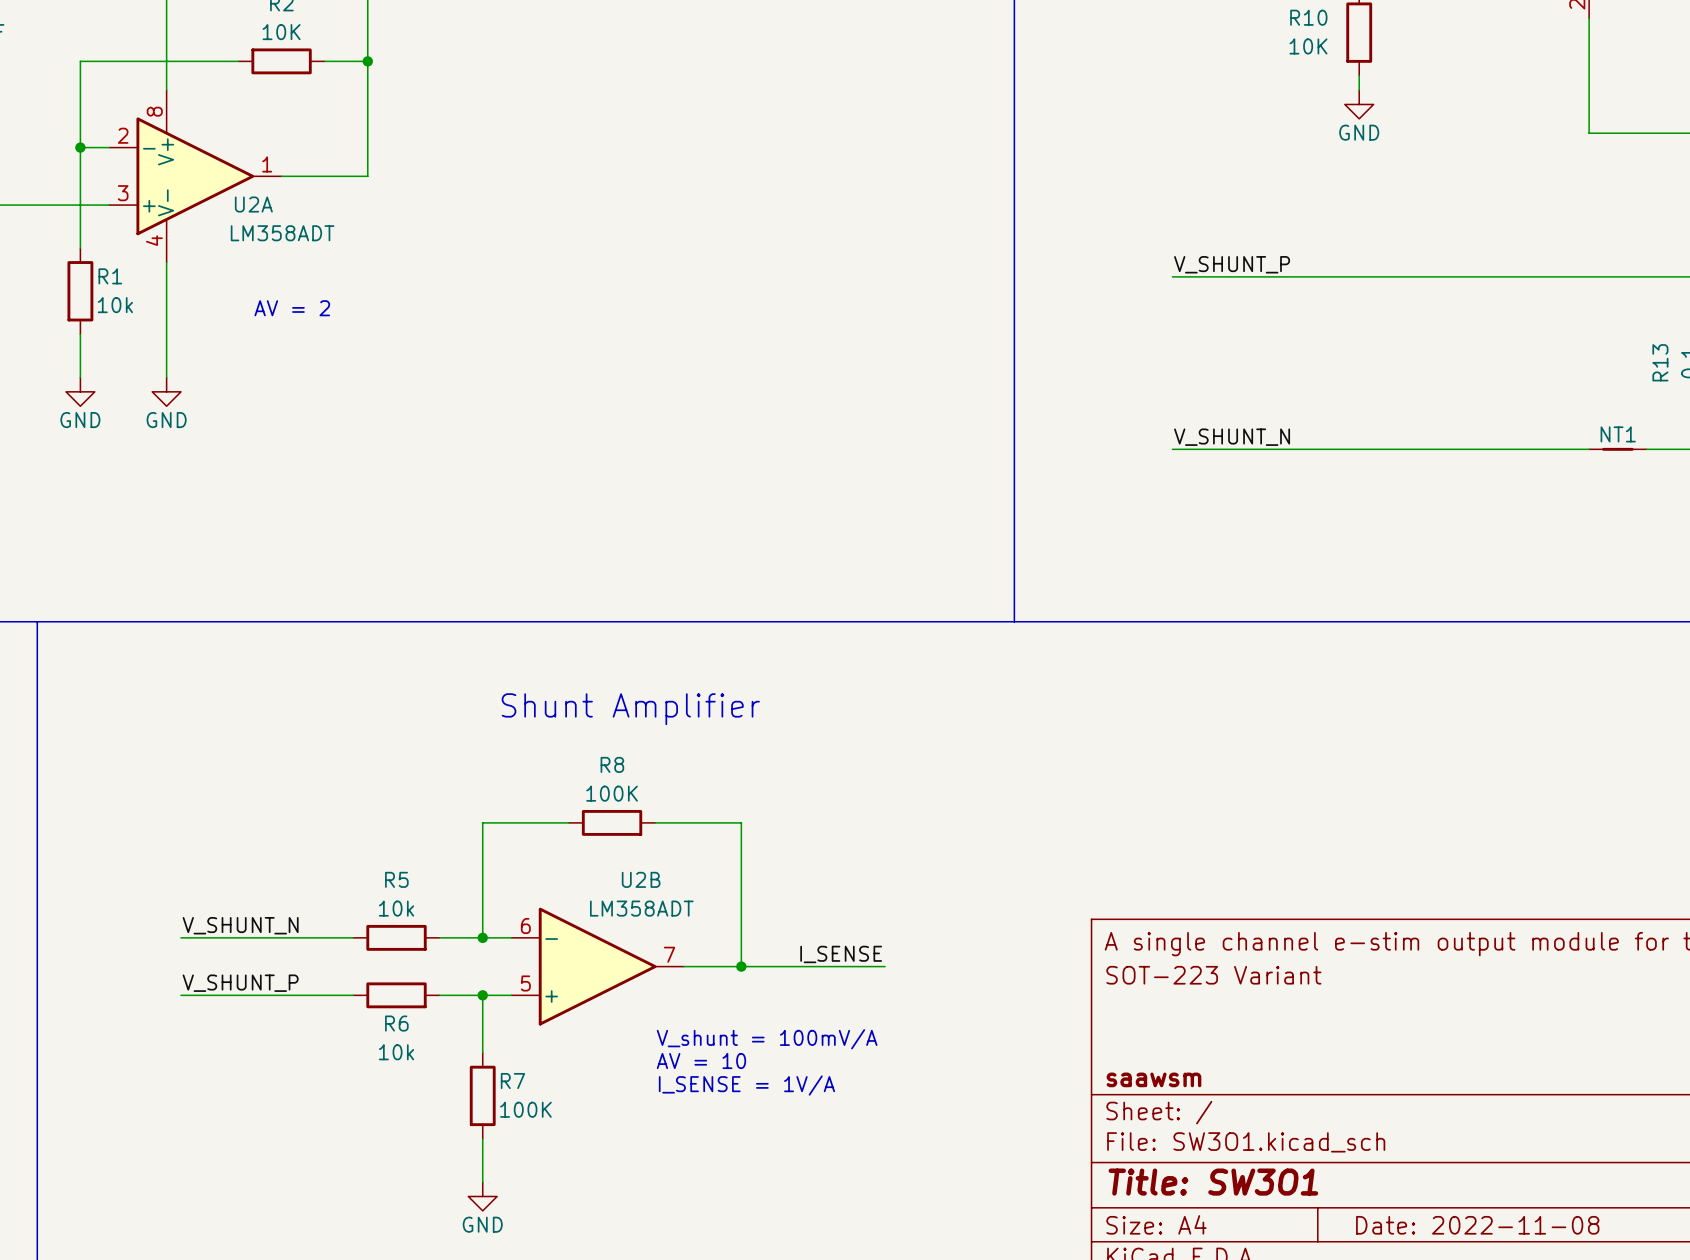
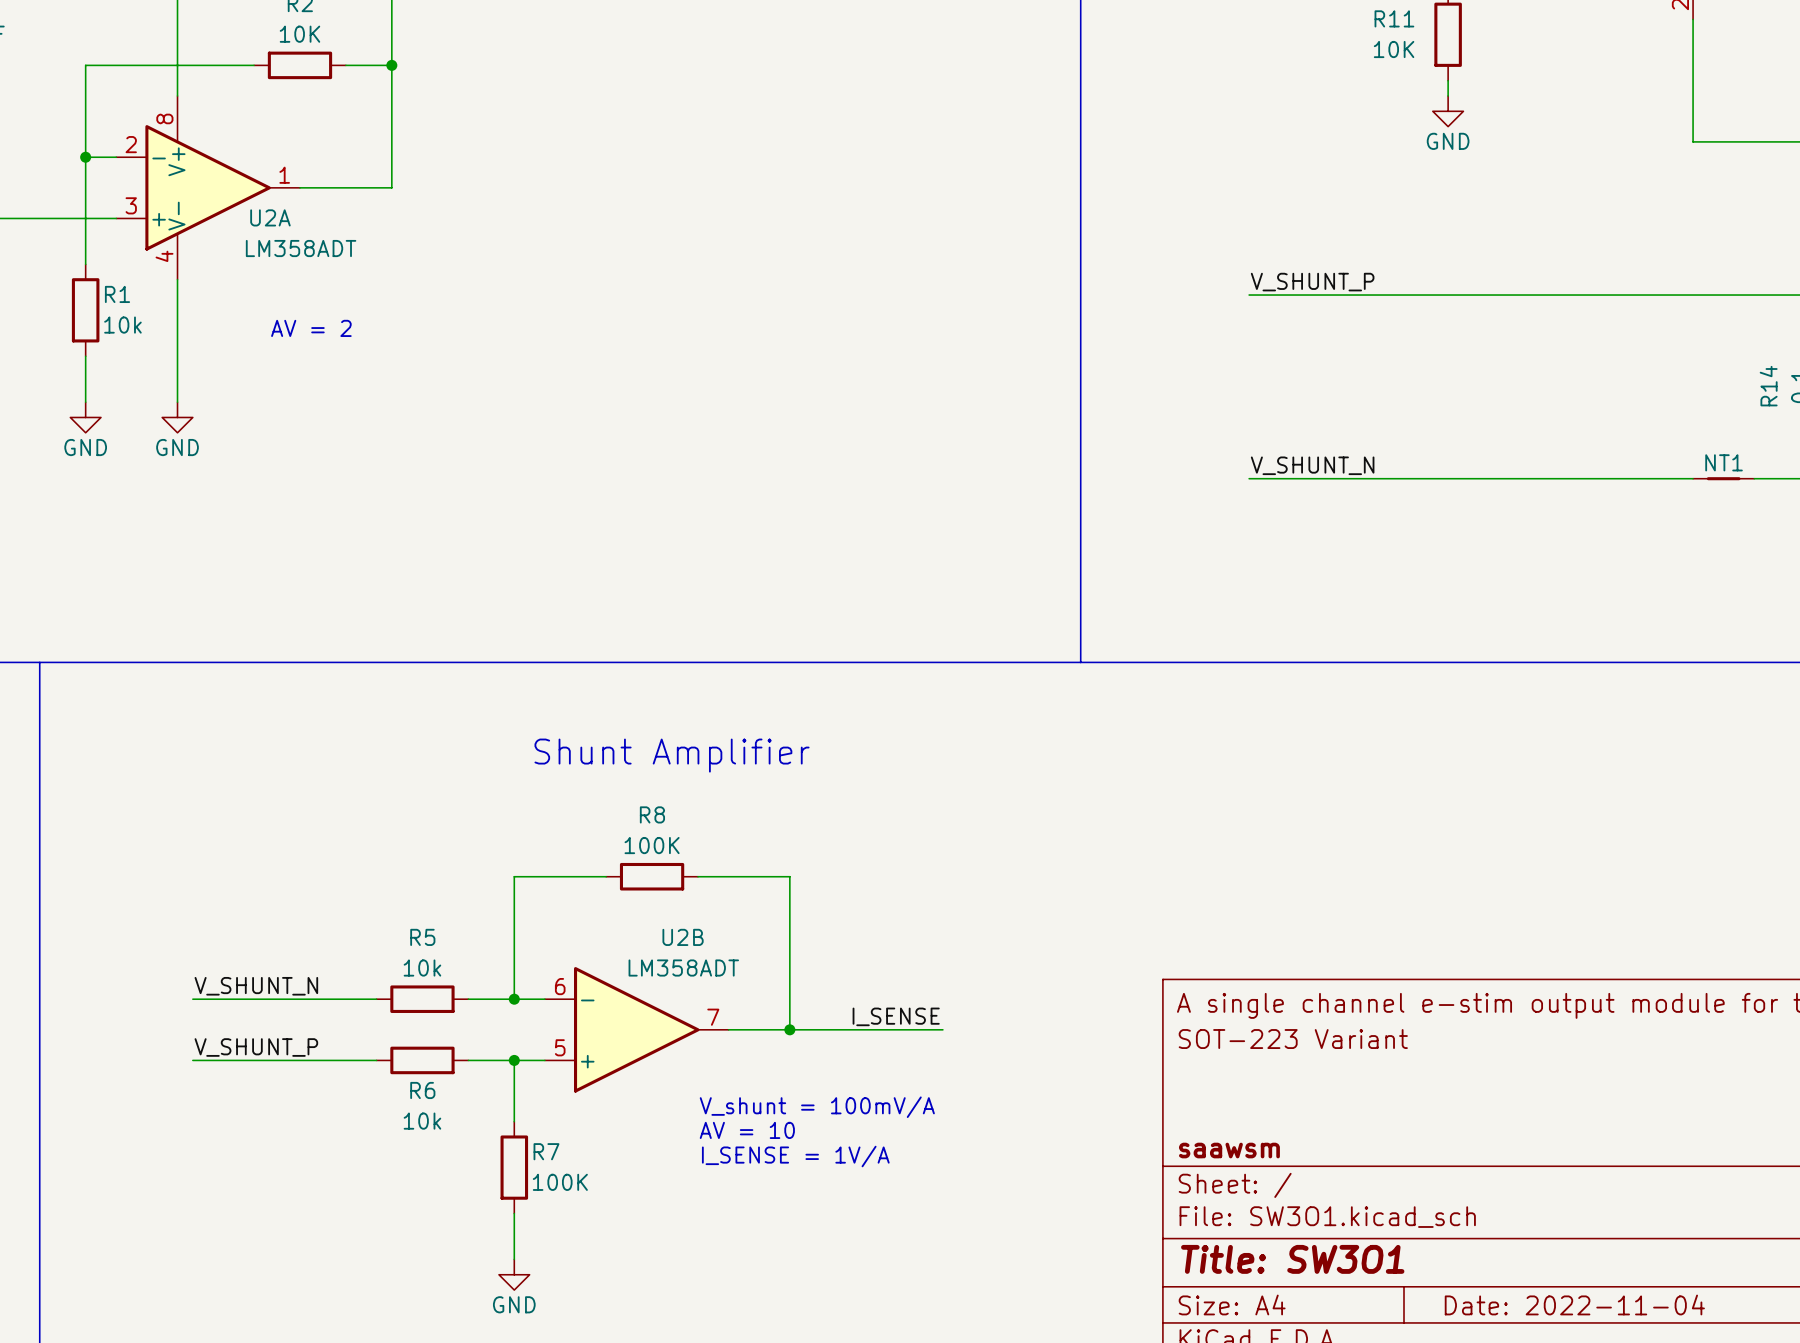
R10 name: R10 (1308, 17) -> R11 (1394, 18)
R13 name: R13 (1660, 362) -> R14 (1768, 386)
title block: Date: 2022-11-08 (1477, 1225) -> Date: 2022-11-04 (1574, 1304)

